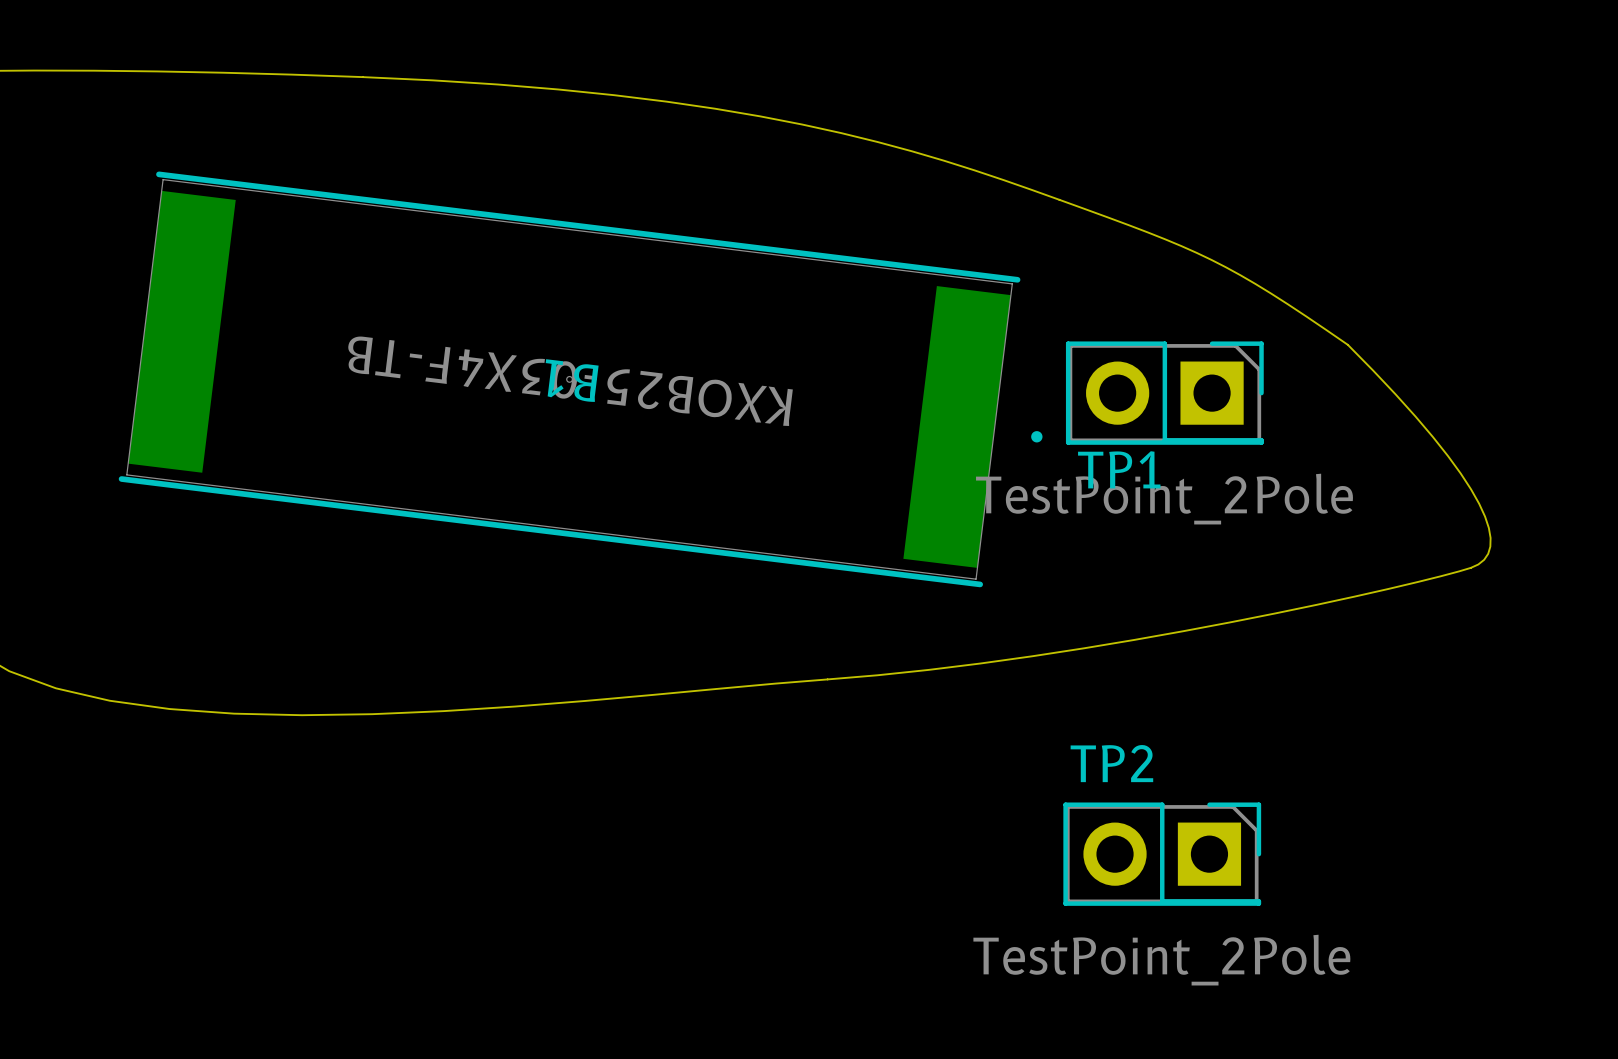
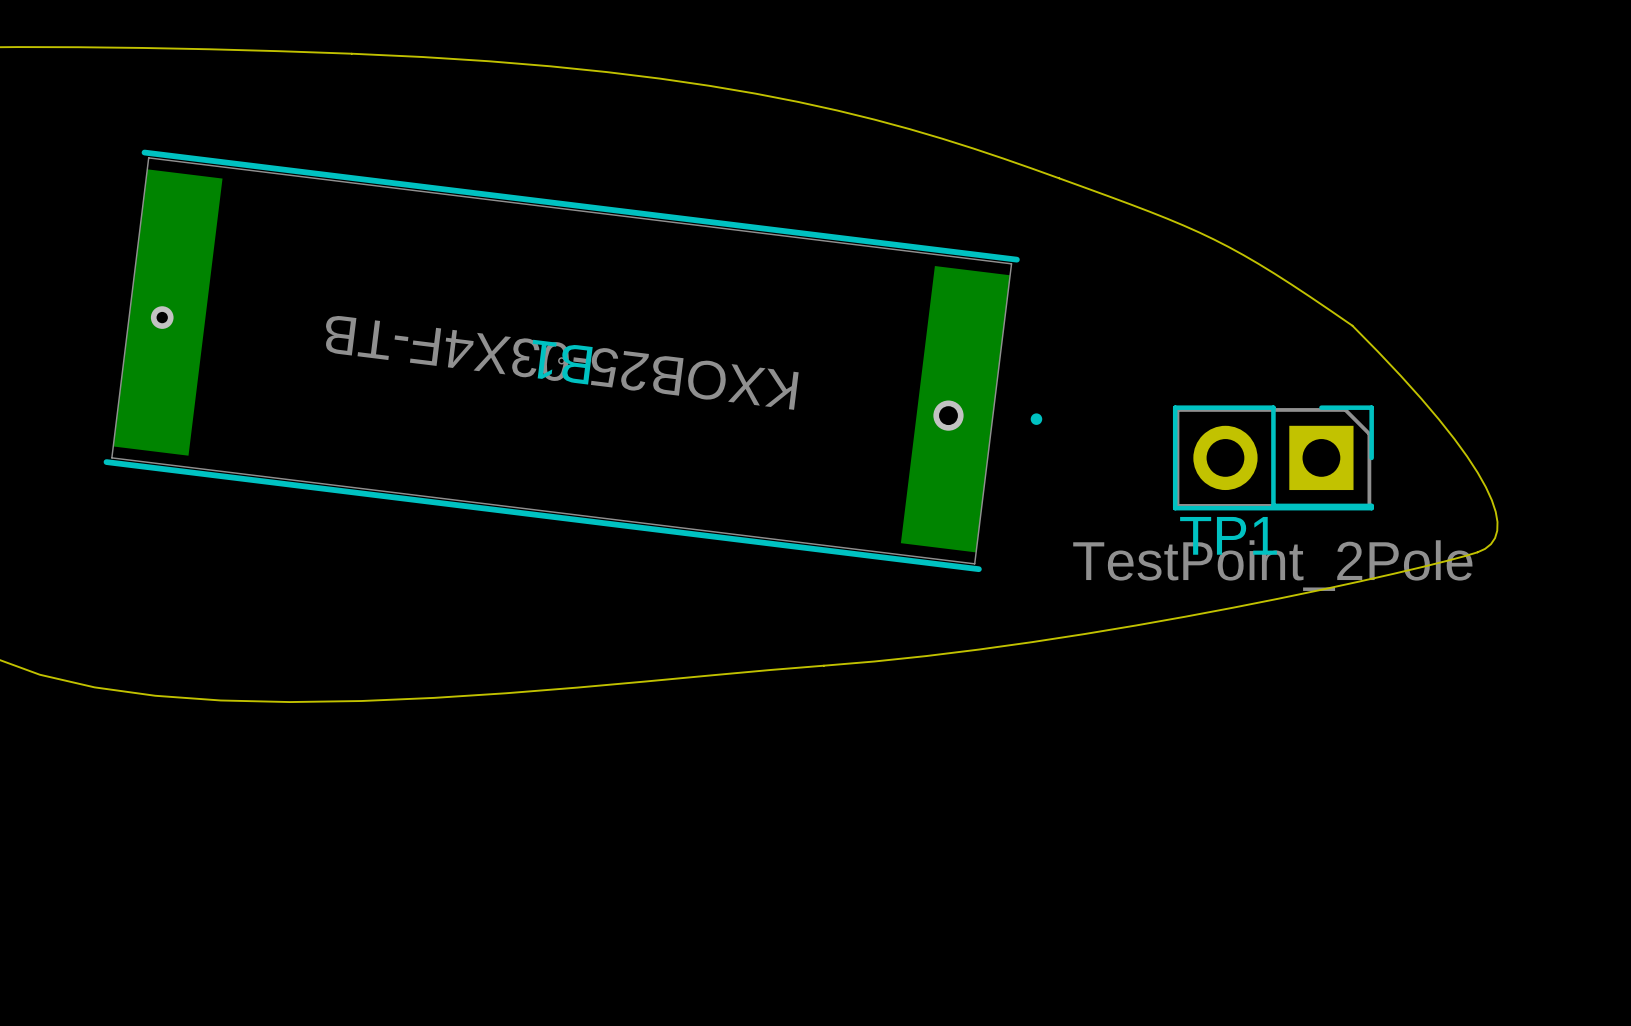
via: none -> (162, 317)
TP1 position: (1164, 393) -> (1273, 457)
via: none -> (948, 415)
TP2: TestPoint_2Pole (1162, 854) -> none

